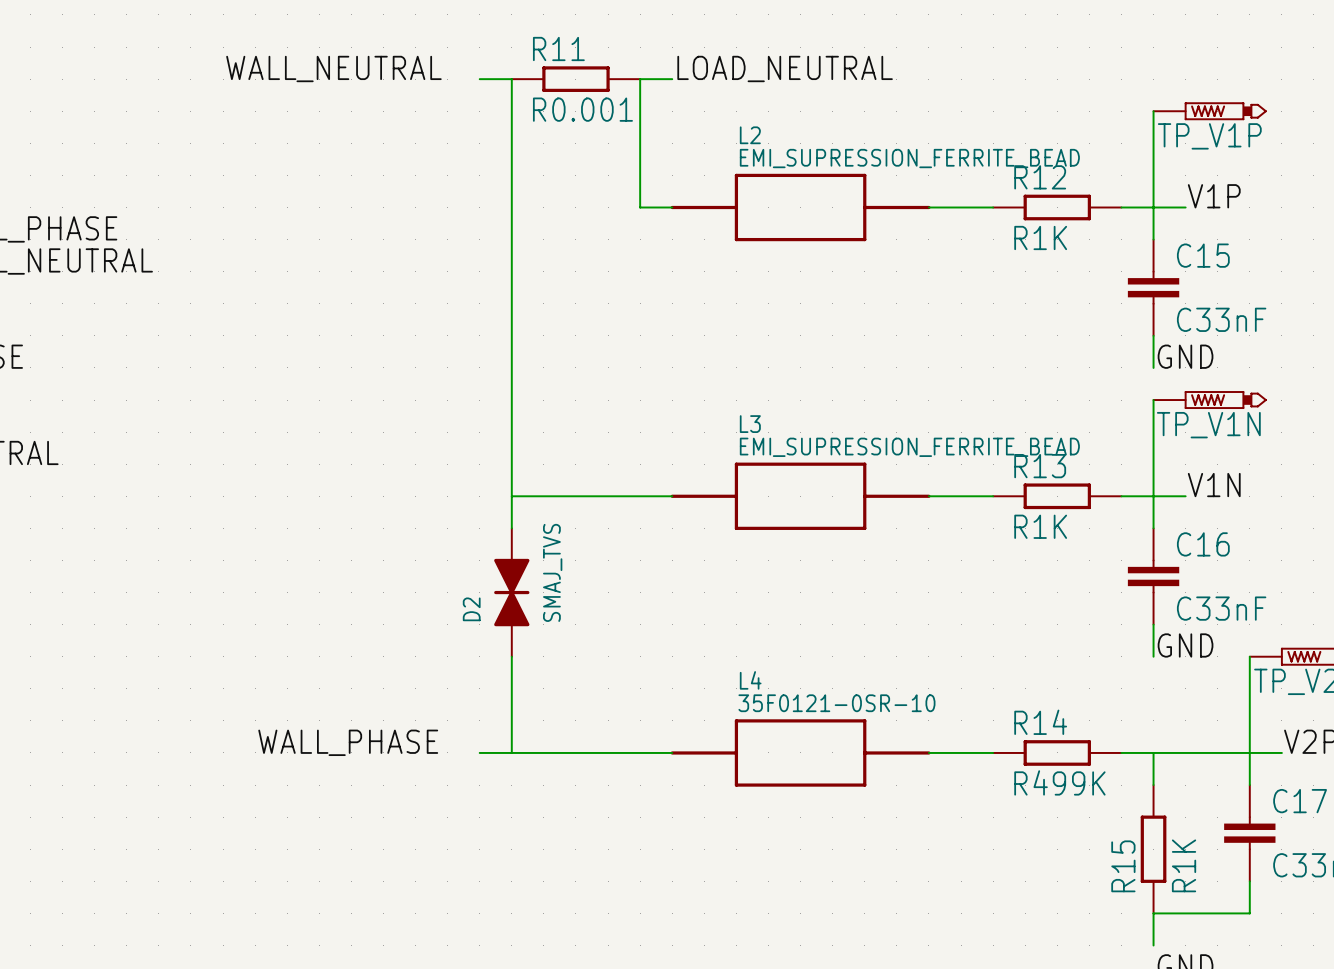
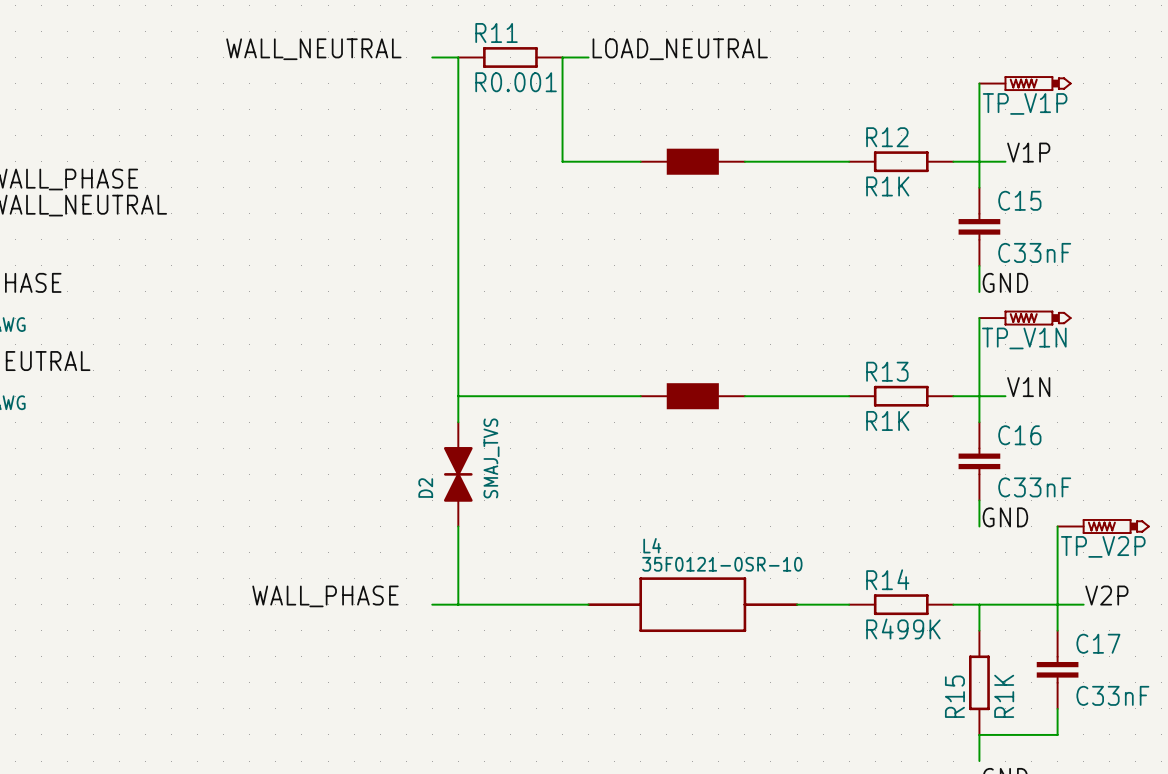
L2: EMI_SUPRESSION_FERRITE_BEAD (800, 207) -> none
part: none -> (692, 161)
L3: EMI_SUPRESSION_FERRITE_BEAD (800, 496) -> none
part: none -> (692, 396)

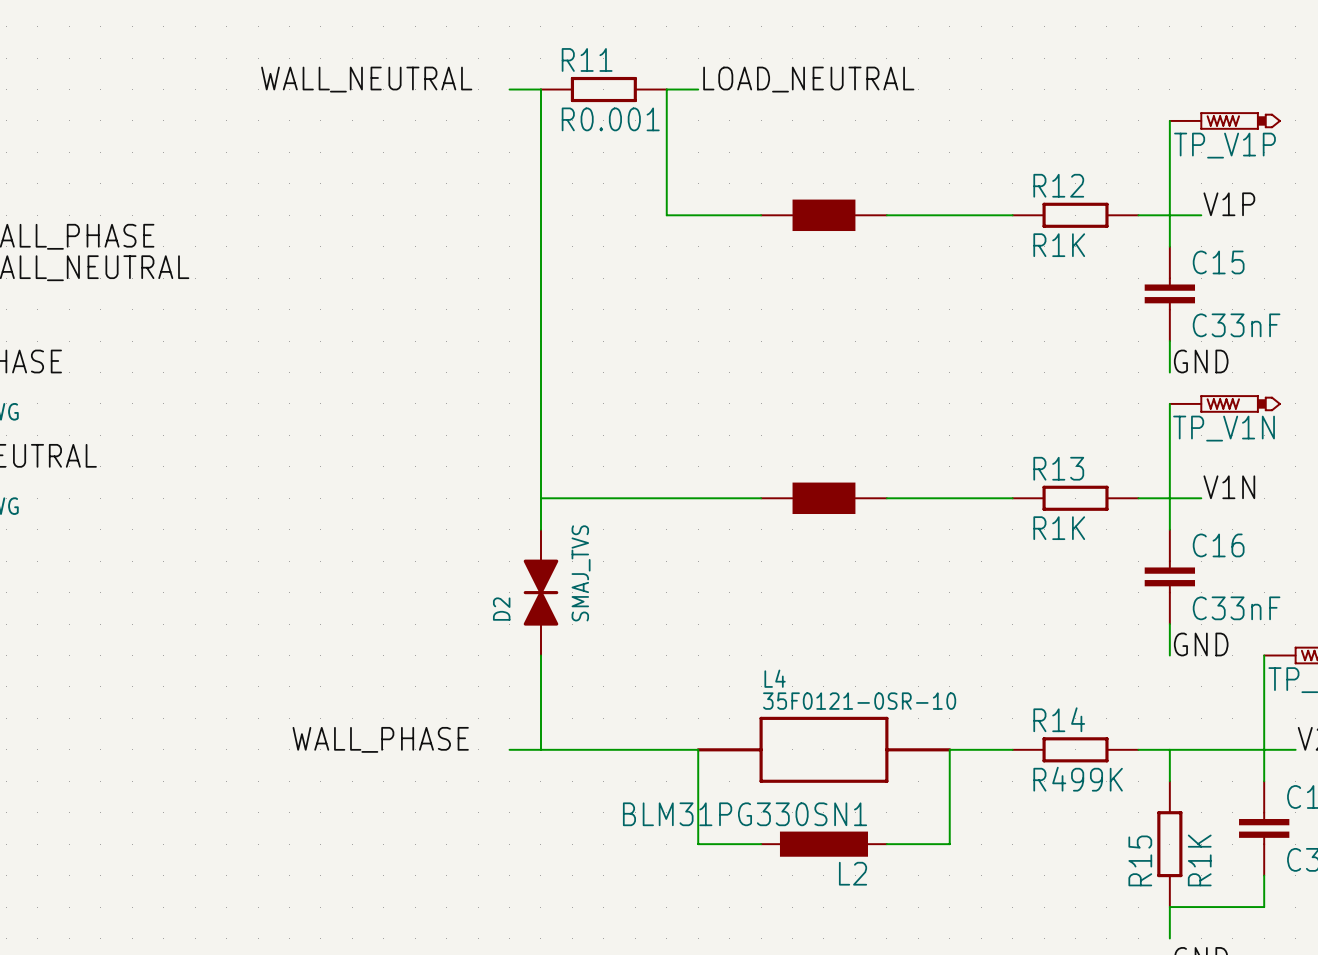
wire: none -> (698, 749) (698, 844) (761, 844)
wire: none -> (949, 749) (949, 844) (886, 844)
L2: none -> BLM31PG330SN1 (823, 844)

